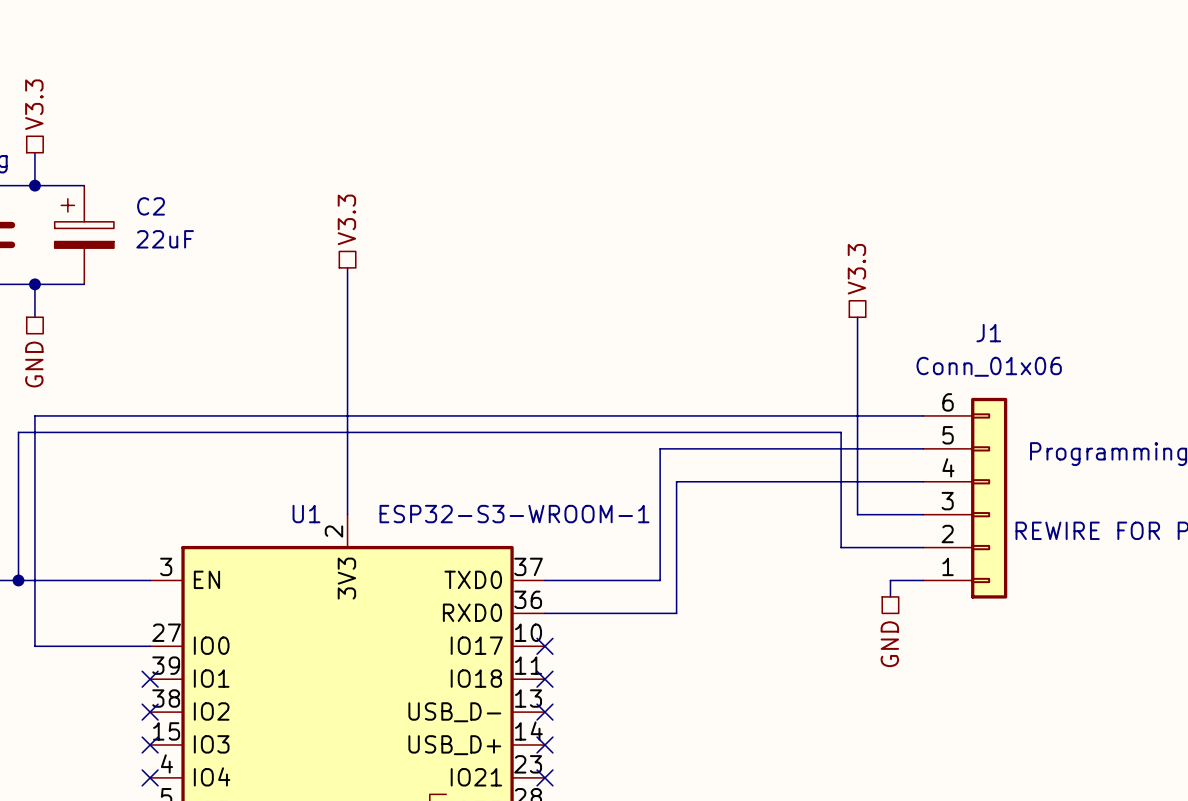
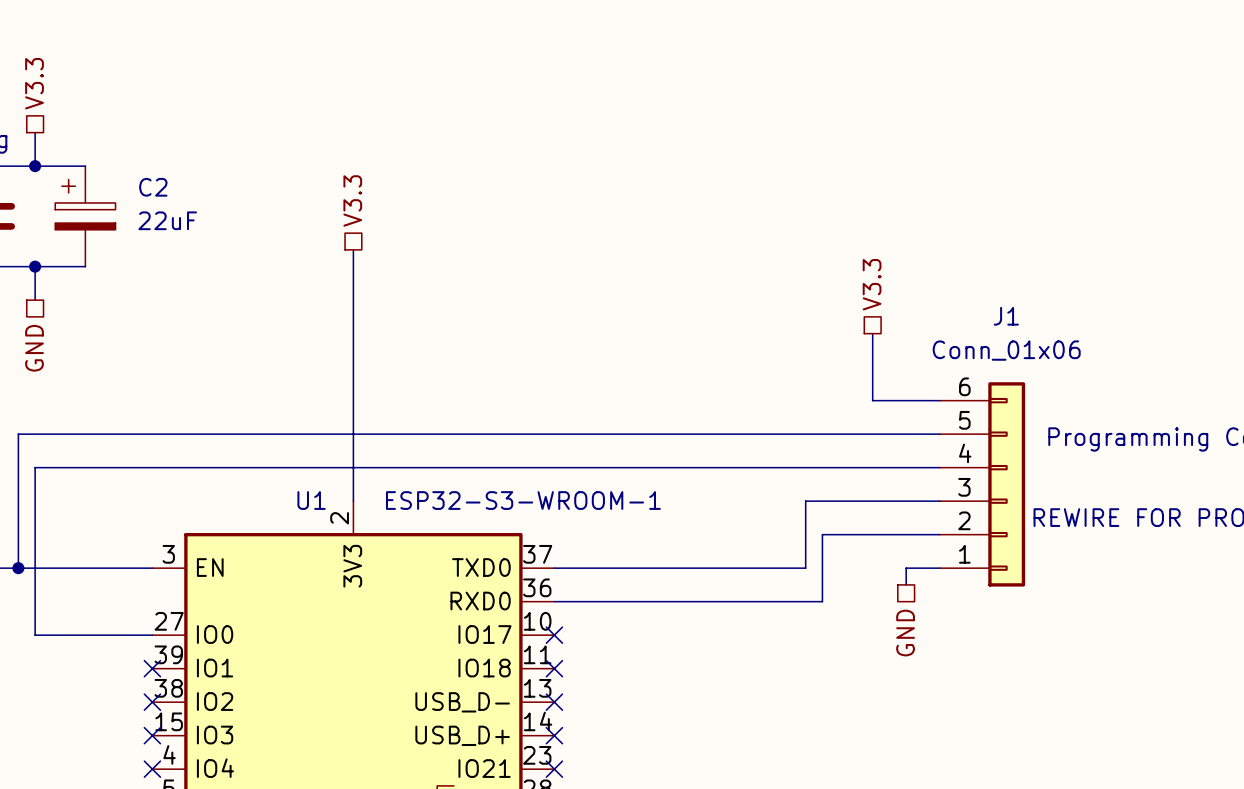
hierarchical label position: V3.3 (856, 269) -> V3.3 (872, 284)
wire: (857, 317) (857, 350) -> none
wire: (18, 448) (18, 432) (841, 432) (841, 547) -> (18, 434) (671, 434)
wire: (660, 448) (660, 580) -> (872, 501) (805, 501) (805, 568) (671, 568)
wire: (34, 481) (34, 415) (857, 415) (857, 514) -> (35, 467) (688, 467)
wire: (676, 481) (676, 613) -> (855, 534) (822, 534) (822, 601) (688, 601)

